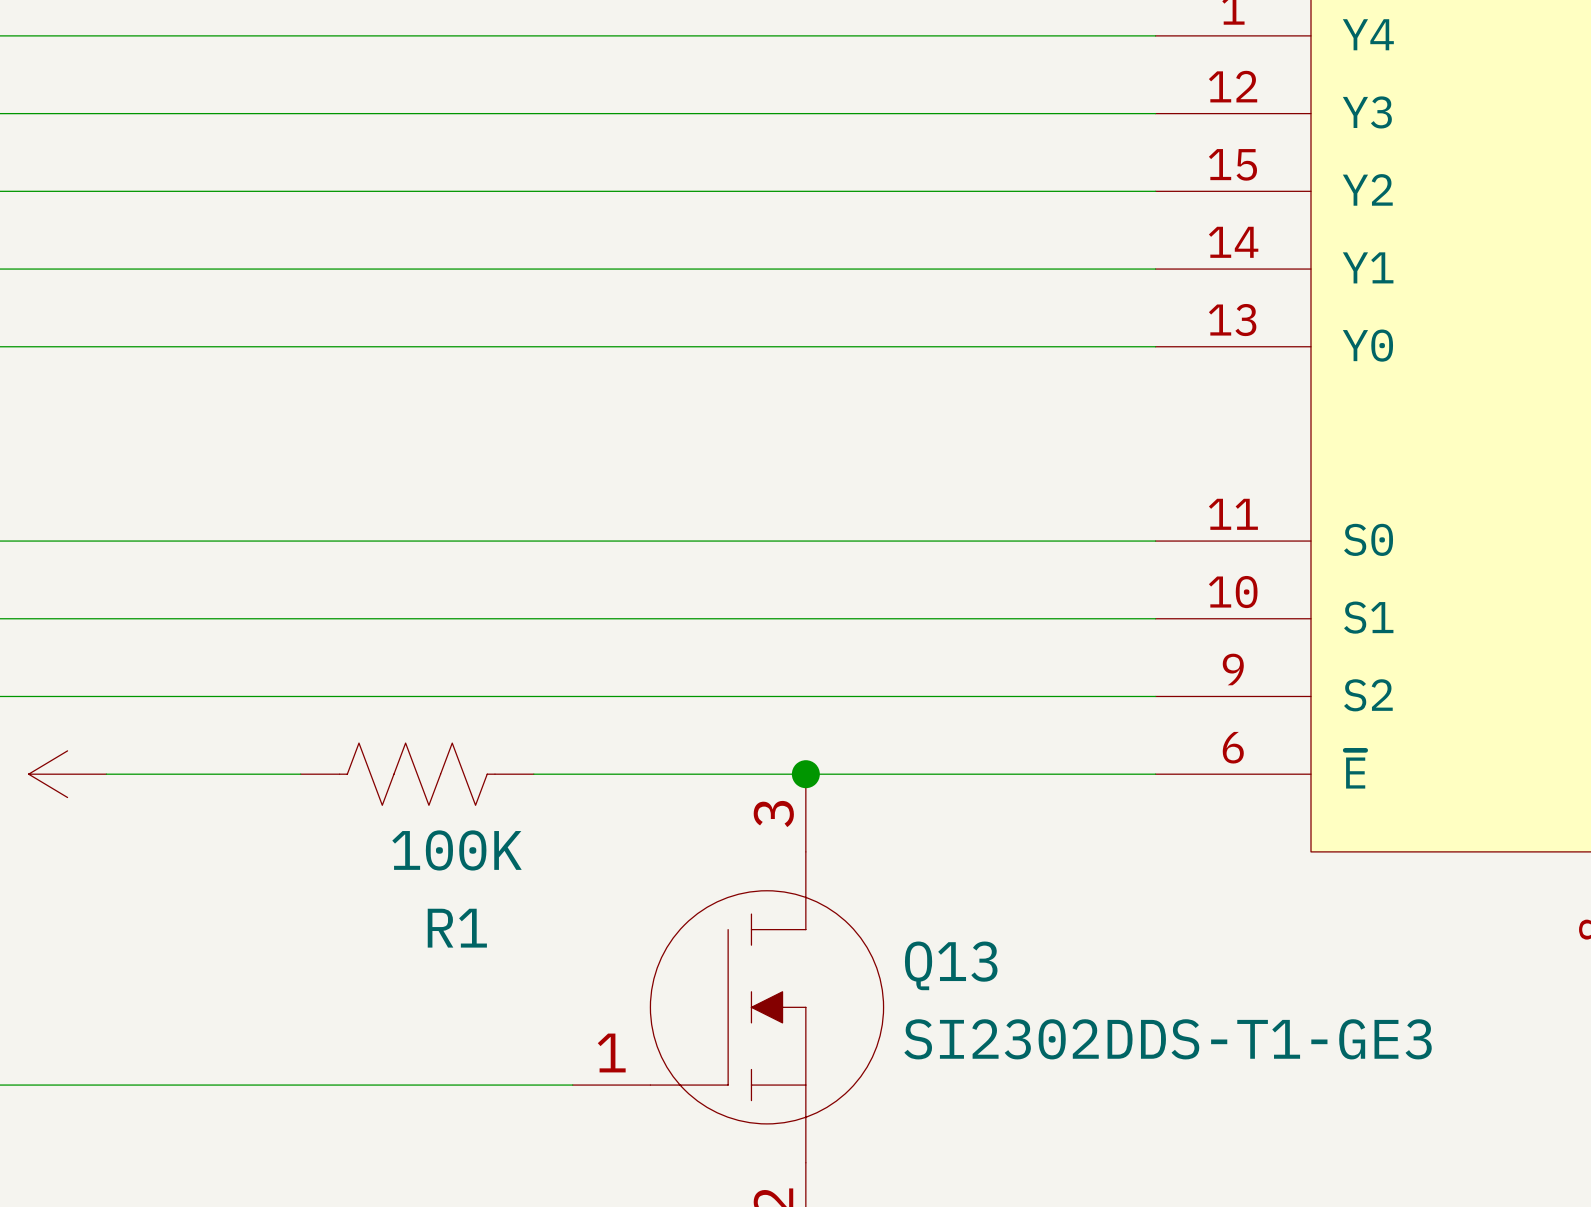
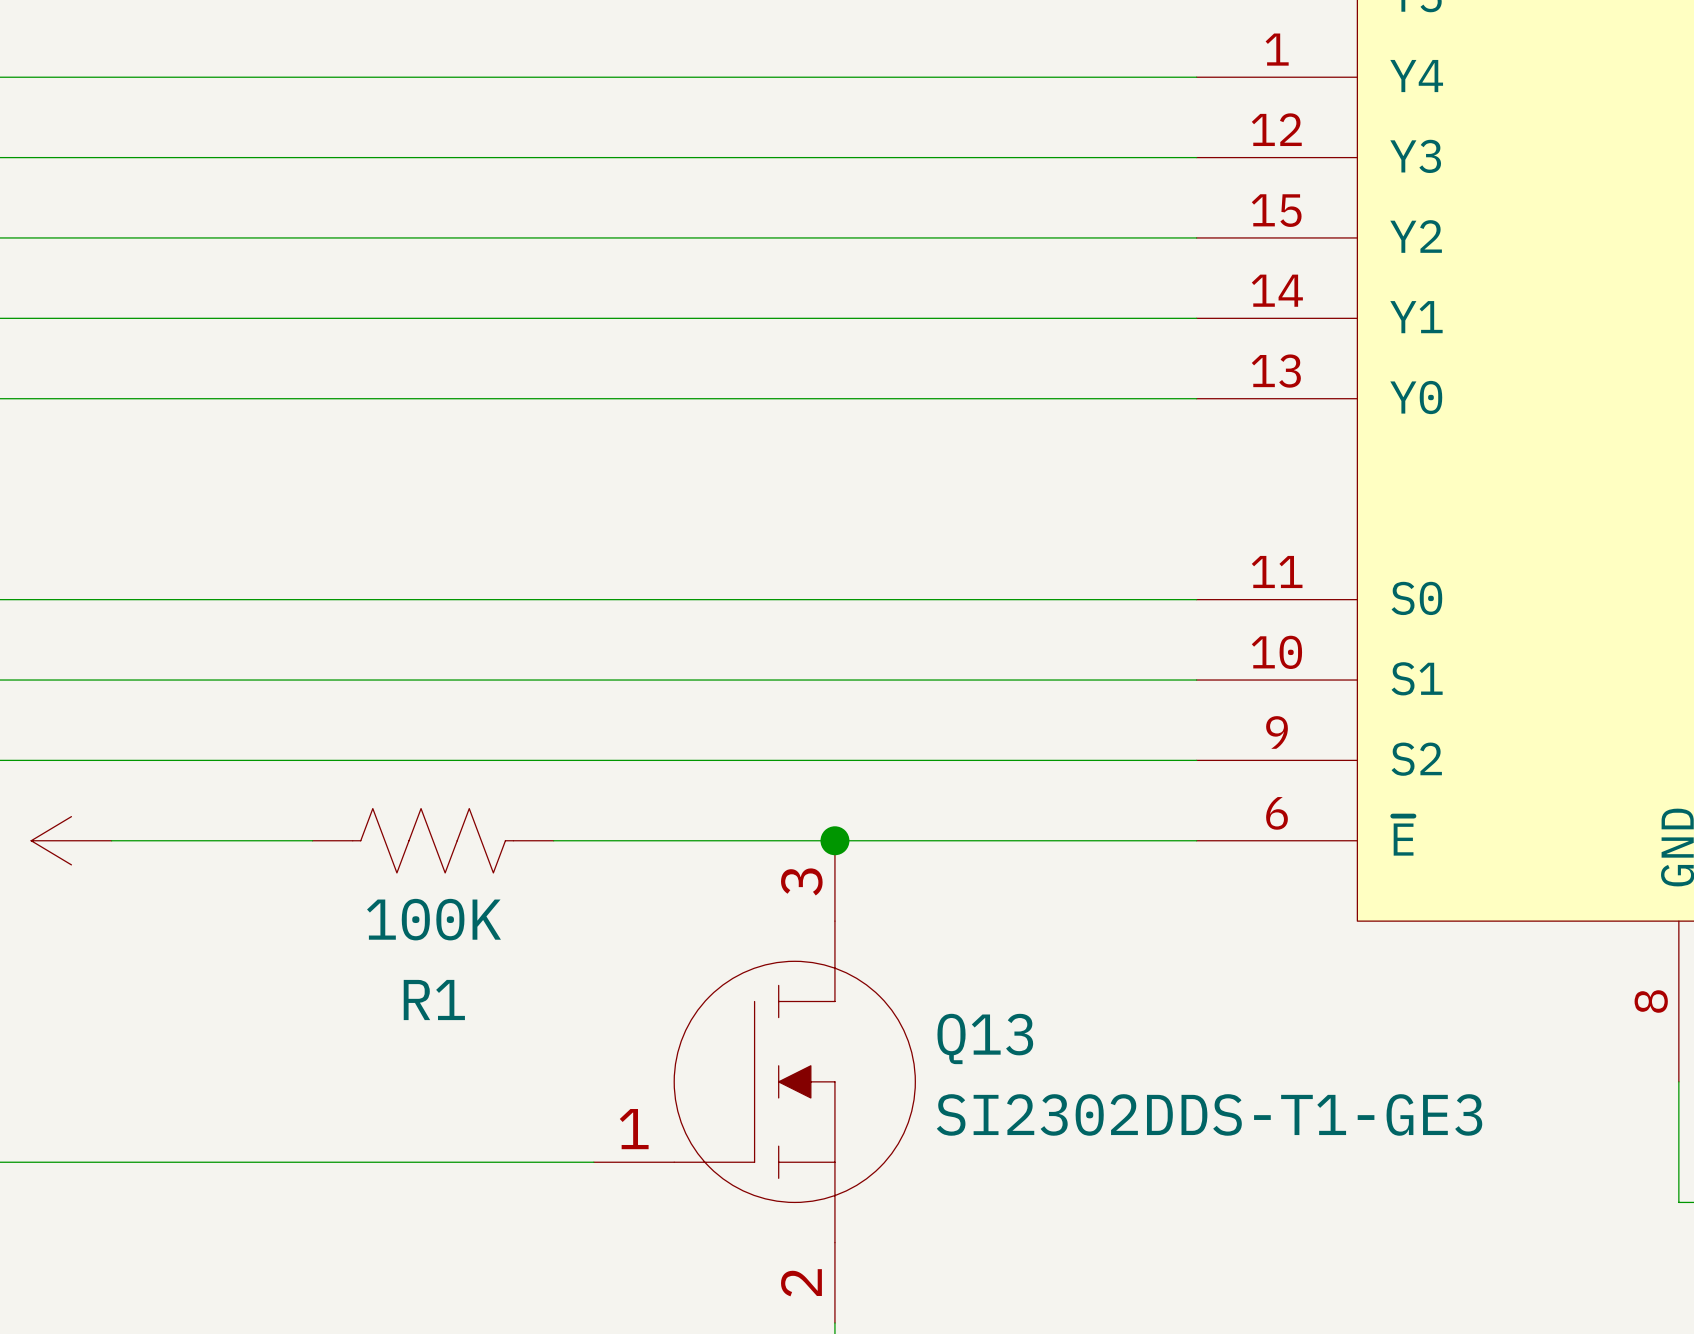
R1 value position: 100K (456, 850) -> 100K (433, 919)
R1 name position: R1 (457, 928) -> R1 (434, 1000)

